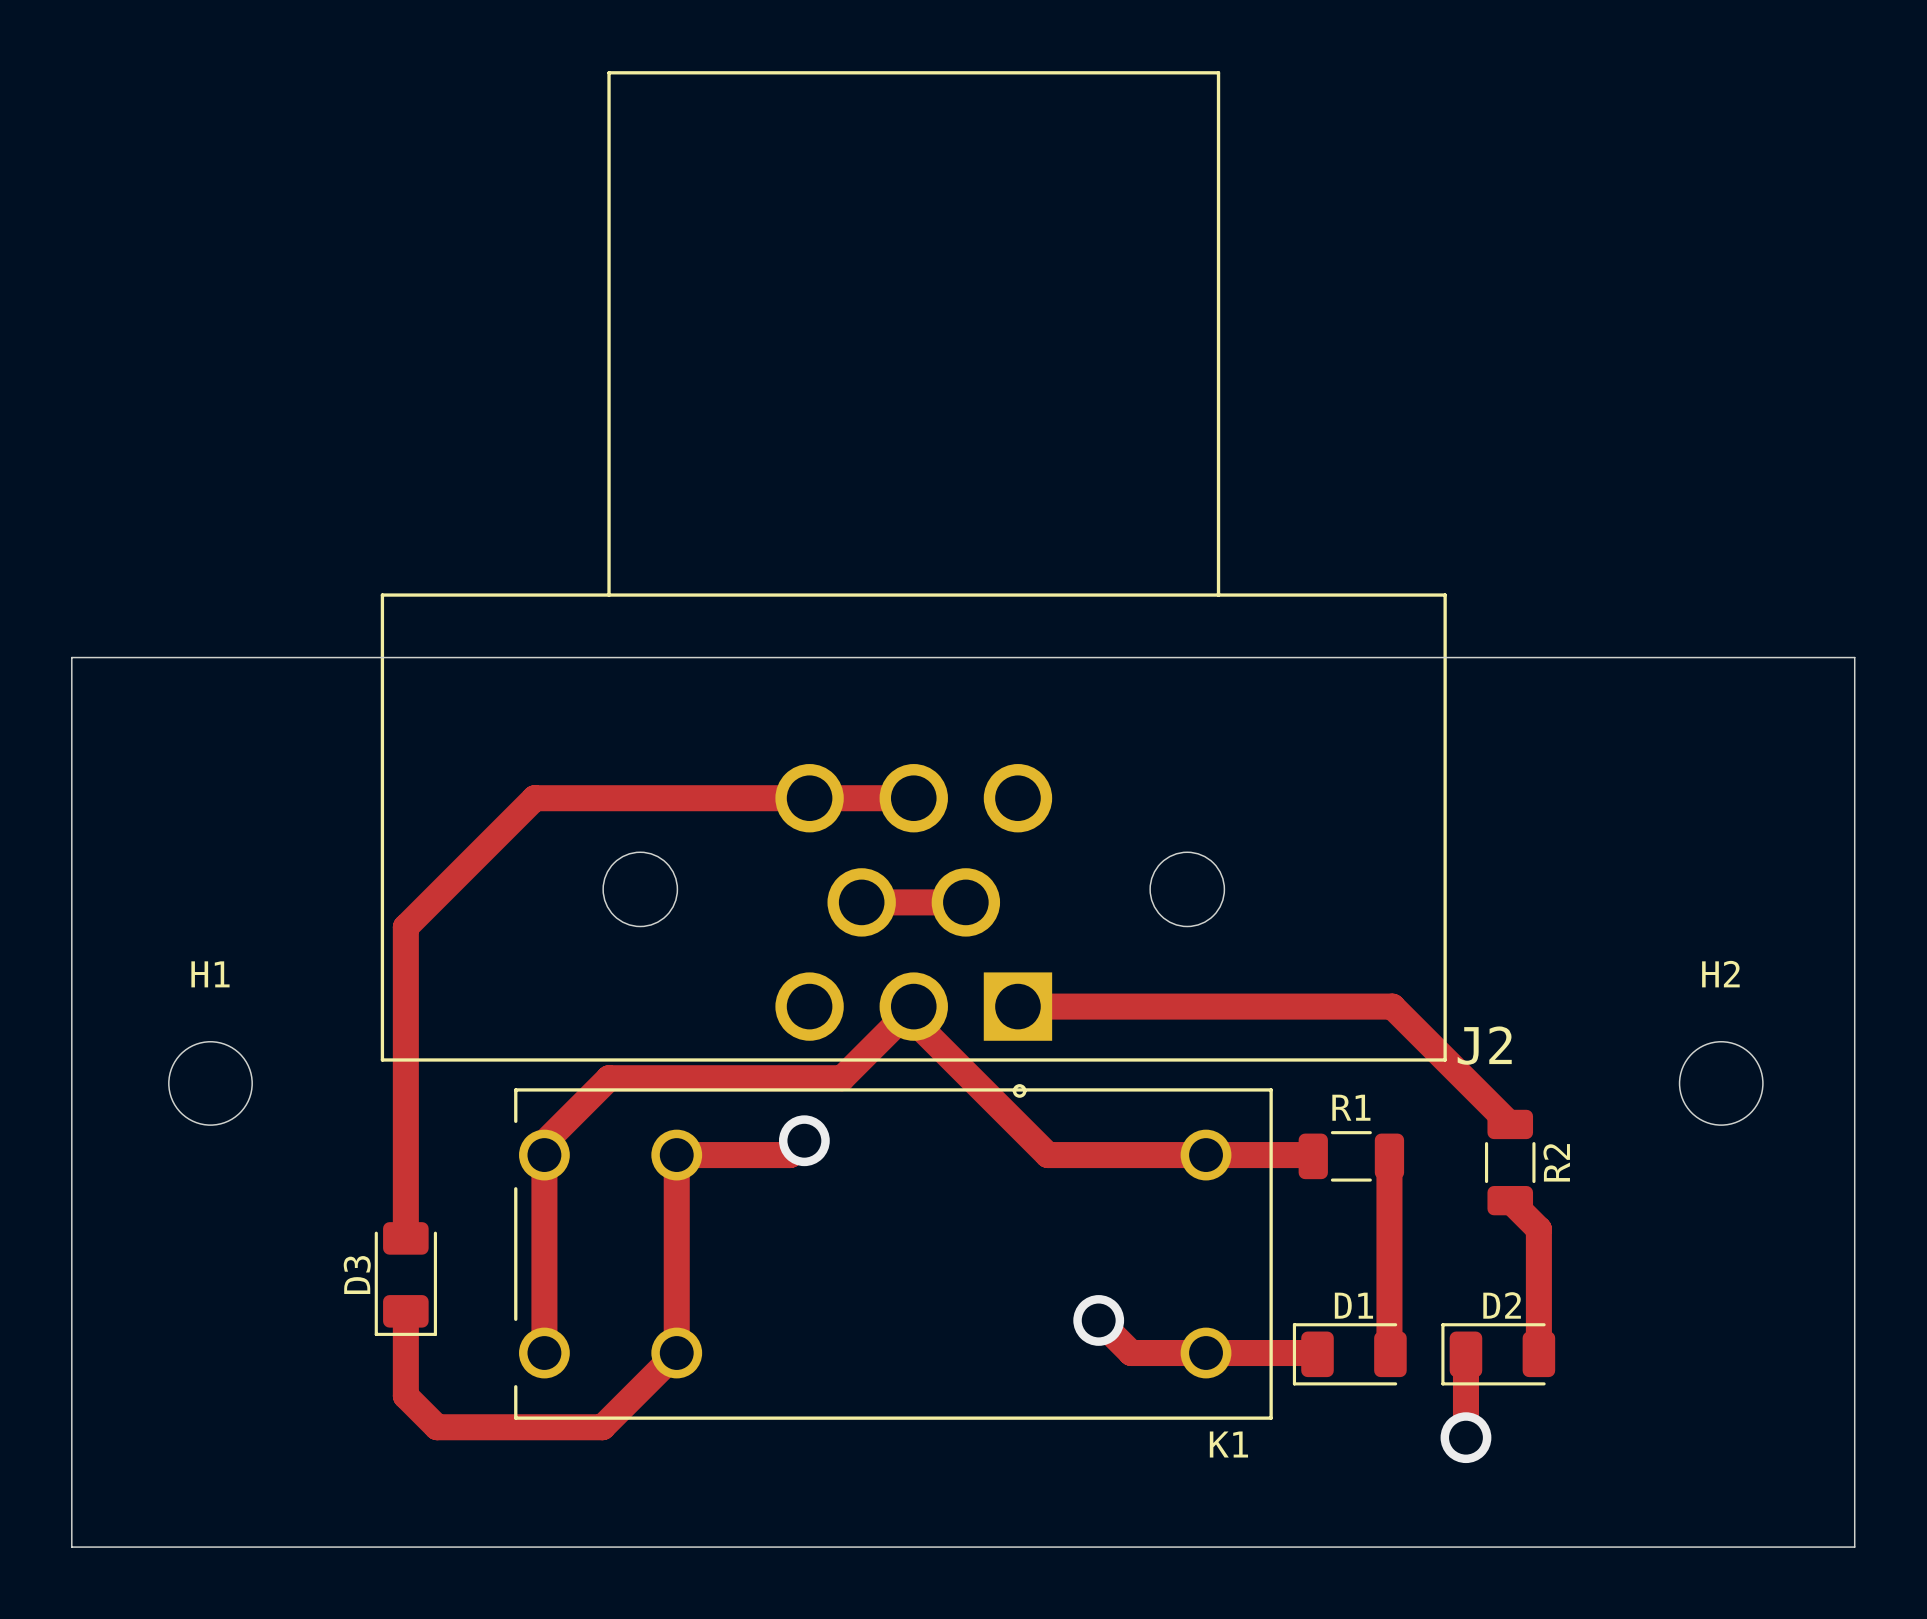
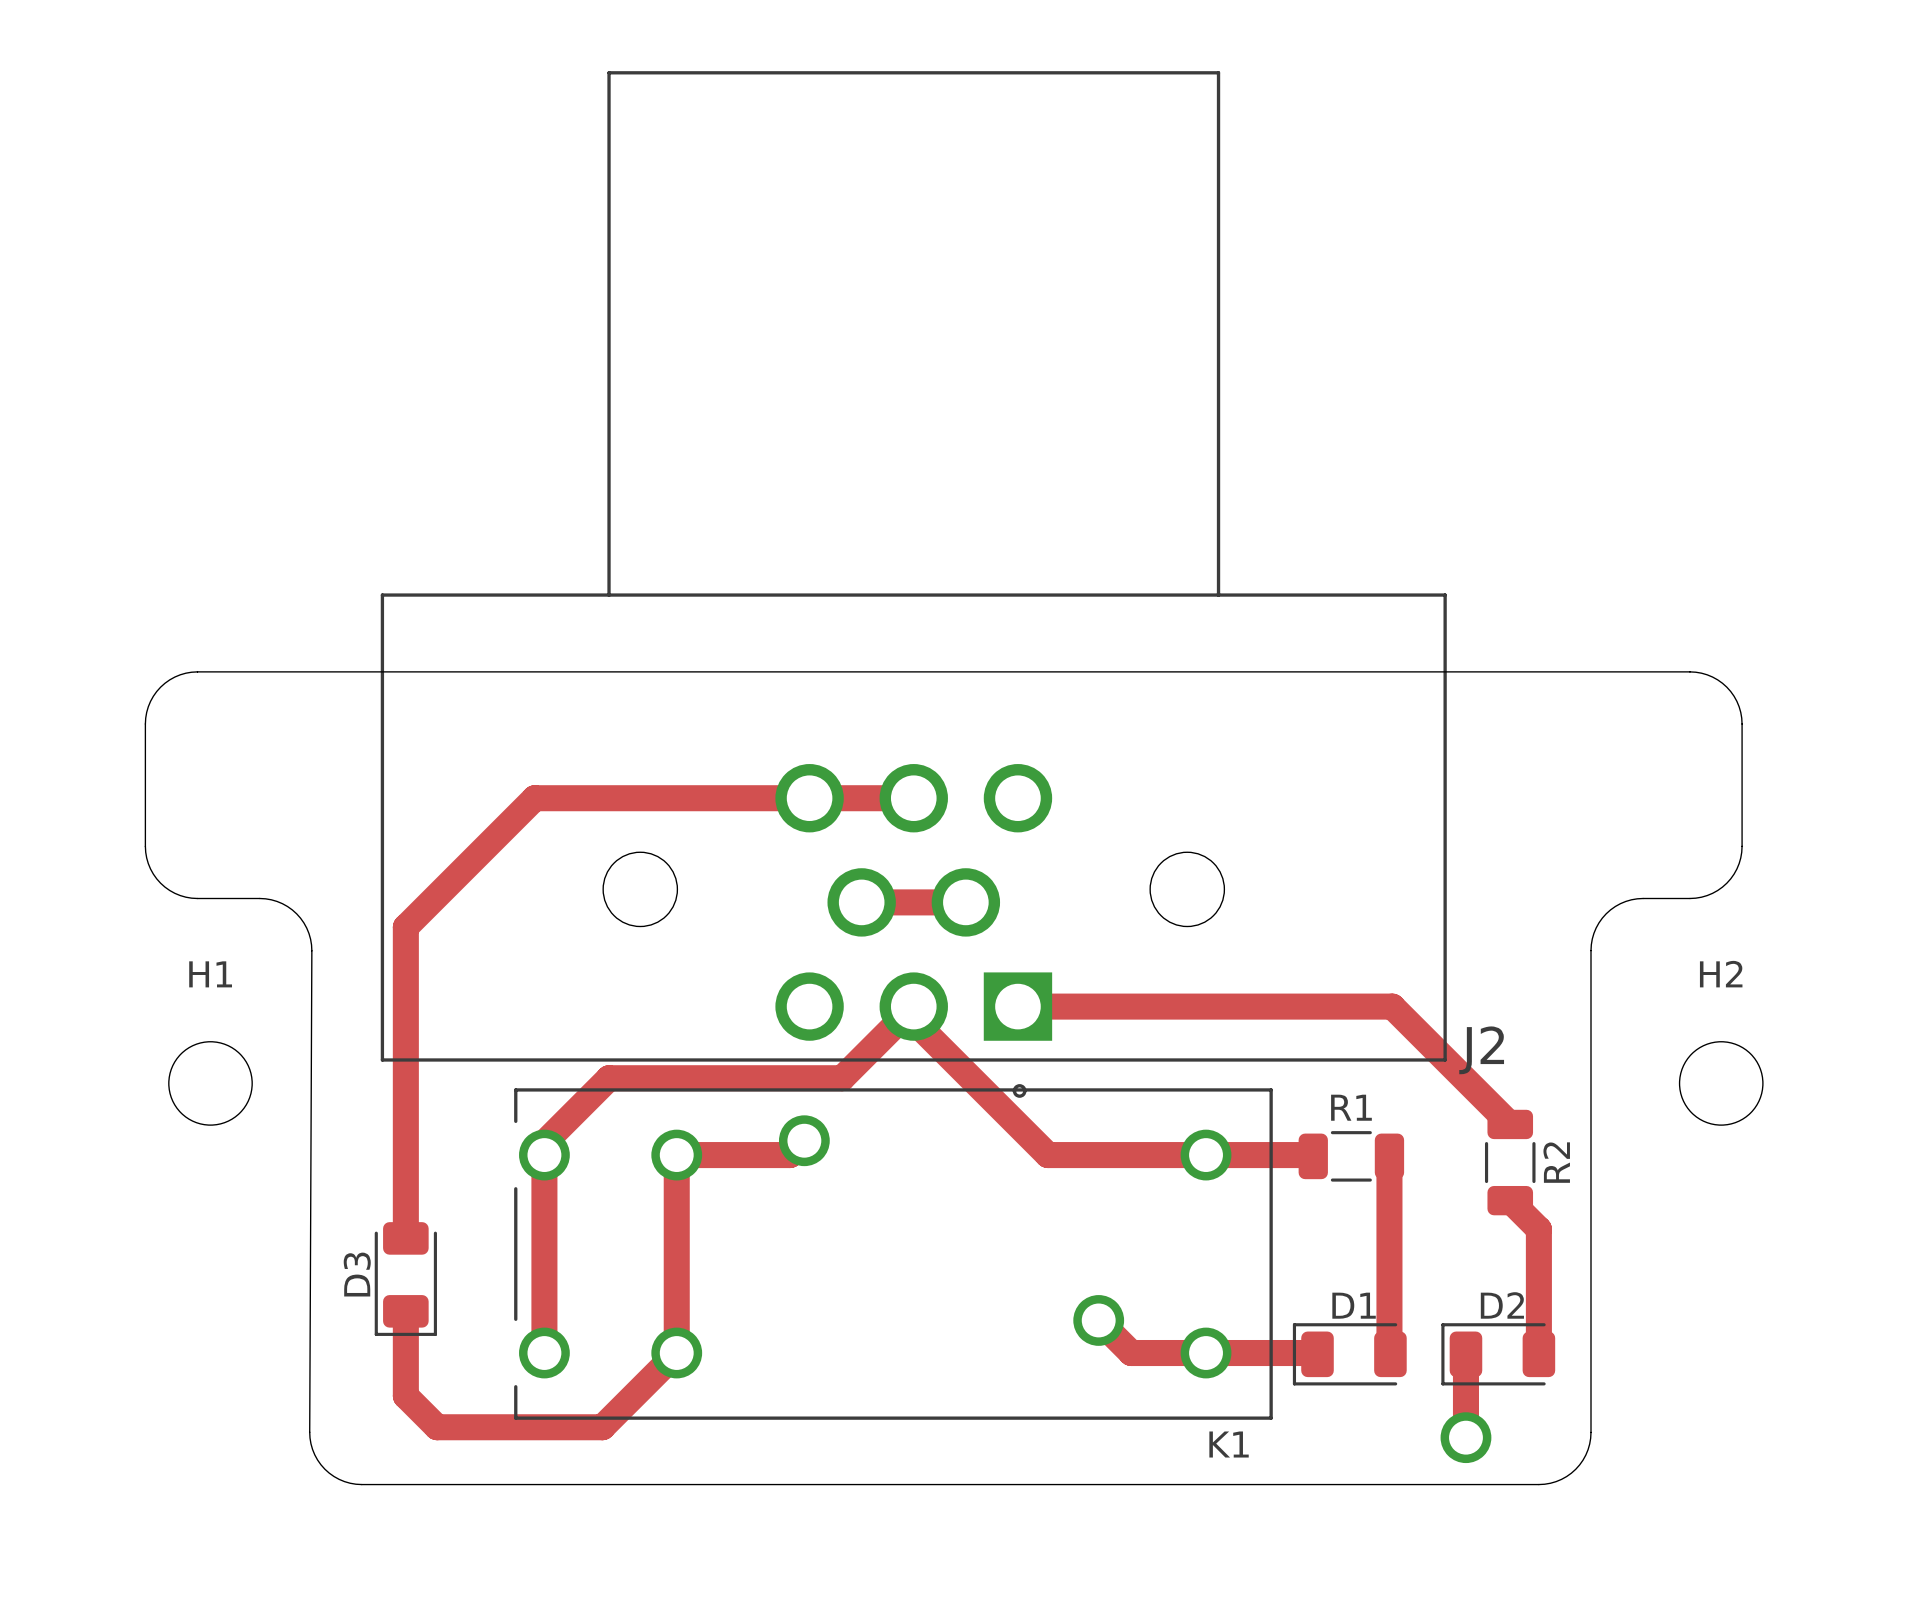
board edge: (71, 657) (1854, 657) (1854, 1547) (71, 1547) (71, 657) -> (197, 671) (180, 674) (165, 683) (153, 696) (146, 712) (145, 852) (153, 874) (160, 883) (174, 893) (191, 898) (259, 898) (277, 901) (296, 913) (308, 933) (311, 950) (309, 1432) (312, 1449) (317, 1460) (334, 1476) (344, 1481) (361, 1484) (1538, 1484) (1556, 1481) (1566, 1476) (1583, 1460) (1589, 1444) (1590, 1432) (1592, 939) (1602, 918) (1620, 903) (1637, 898) (1689, 898) (1707, 895) (1726, 883) (1736, 869) (1742, 846) (1741, 718) (1734, 696) (1717, 679) (1701, 673) (1689, 671) (197, 671)

